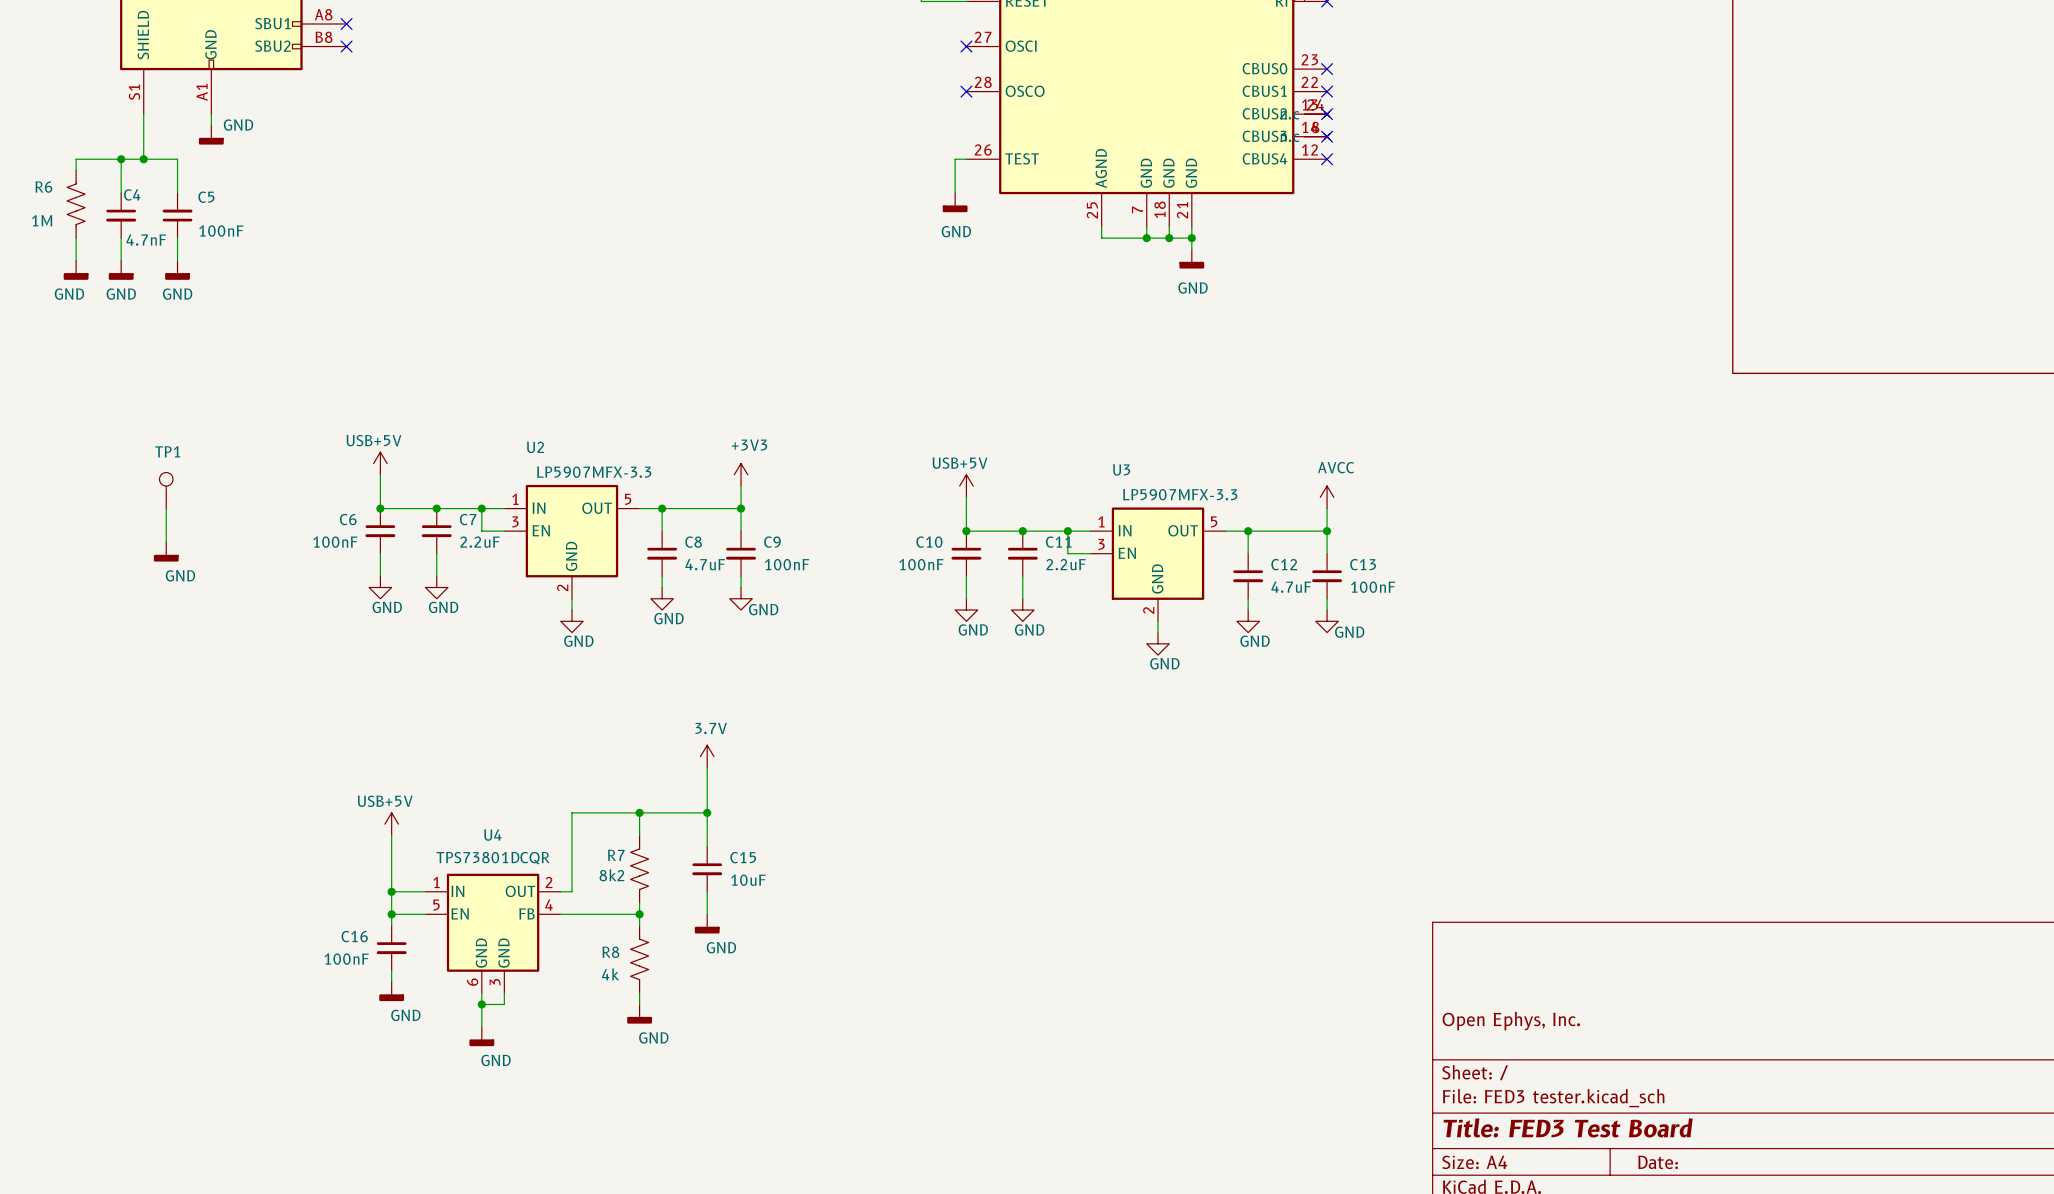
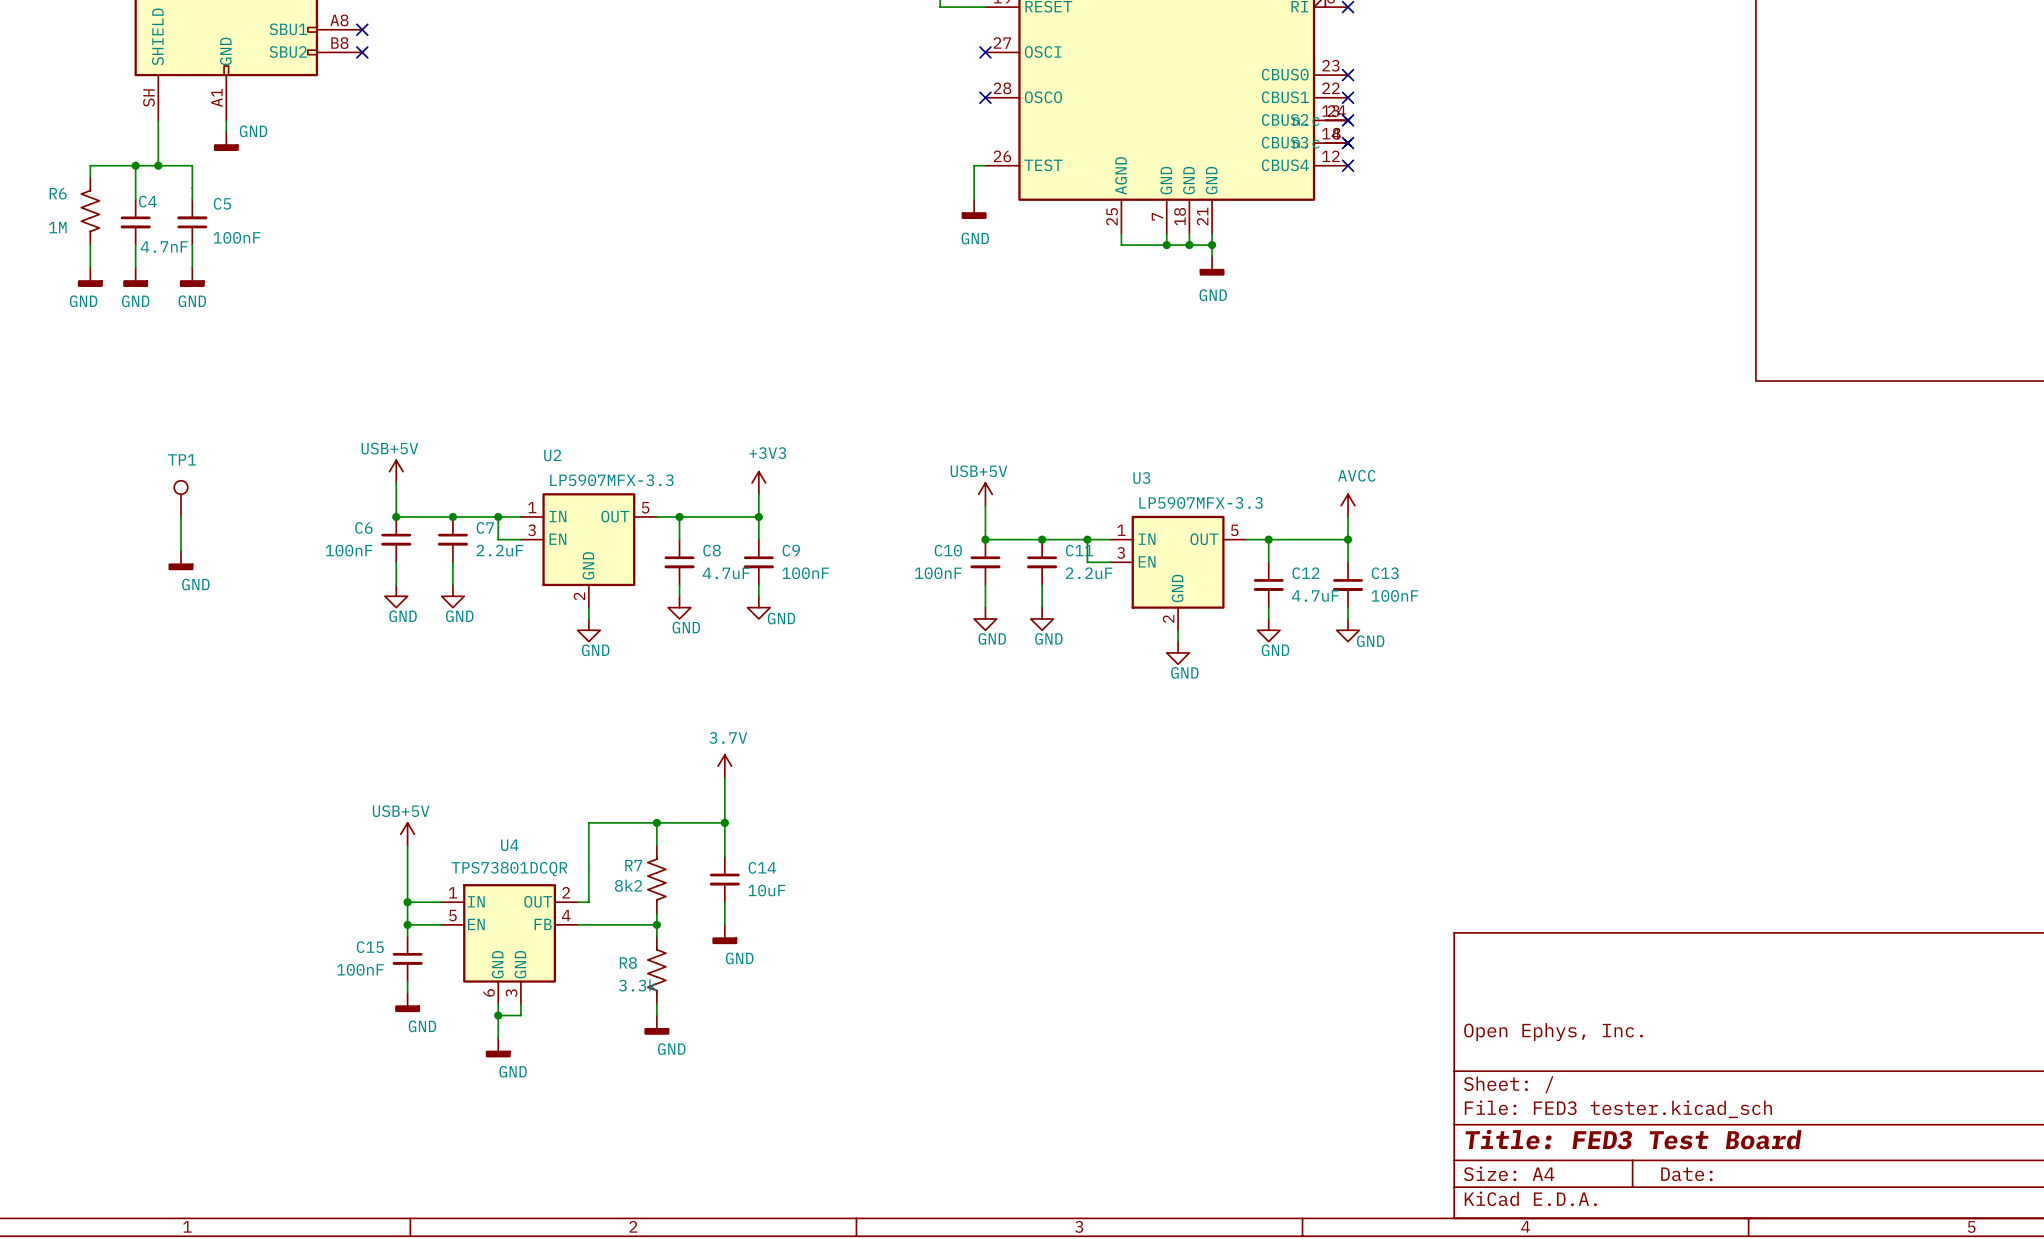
part pin number: S1 (134, 92) -> SH (148, 98)
C15 name: C15 (743, 857) -> C14 (762, 867)
C16 name: C16 (354, 936) -> C15 (370, 947)
R8 value: 4k (610, 974) -> 3.3k (638, 985)

